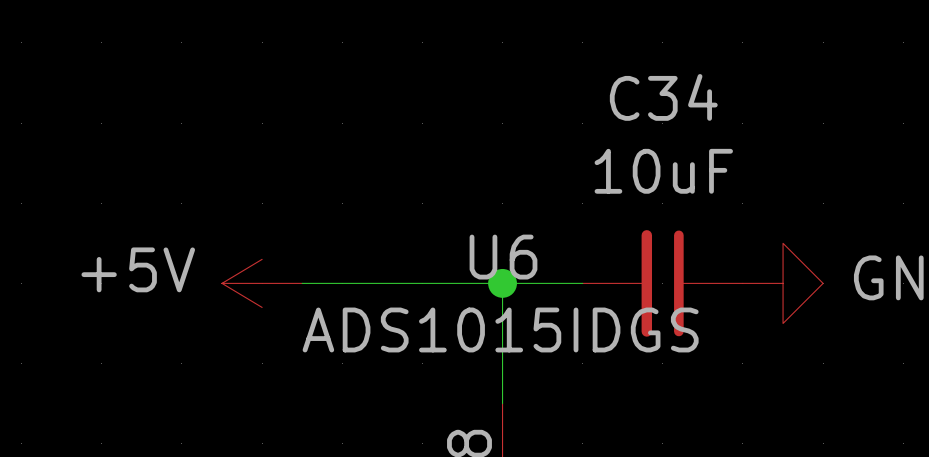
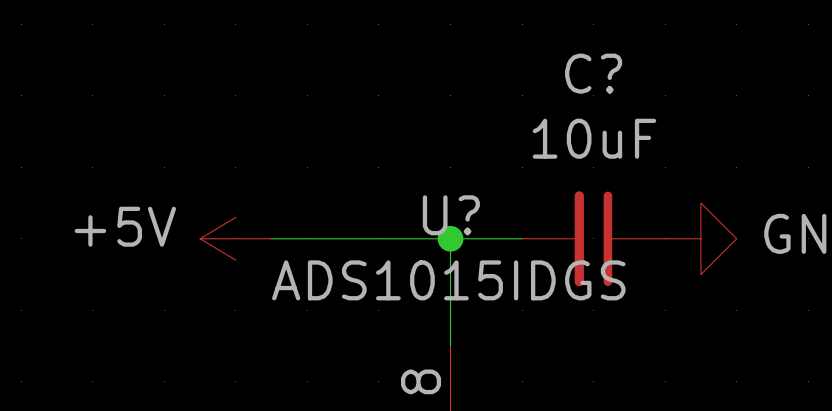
C34 name: C34 (663, 97) -> C? (593, 73)
U6 name: U6 (503, 257) -> U? (451, 215)

